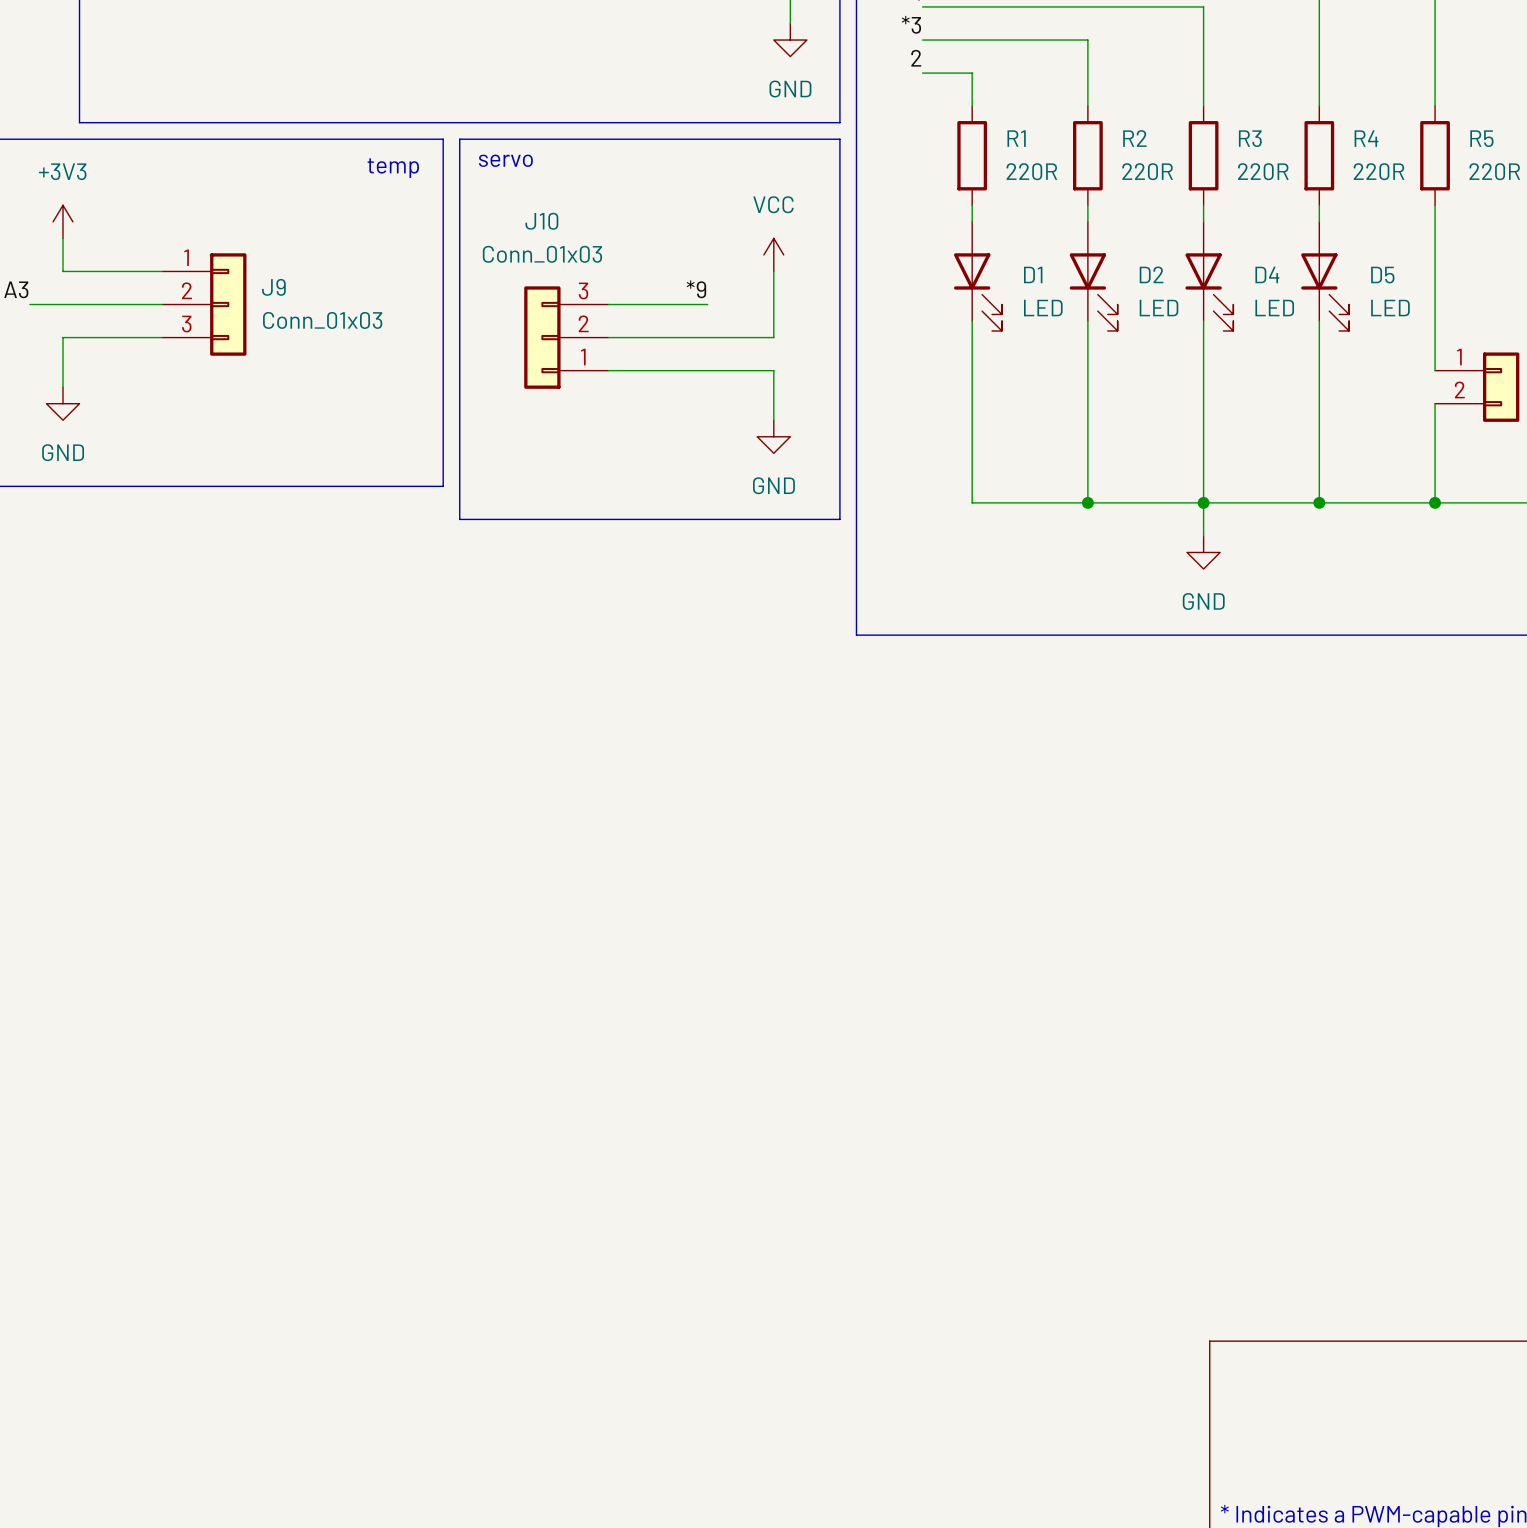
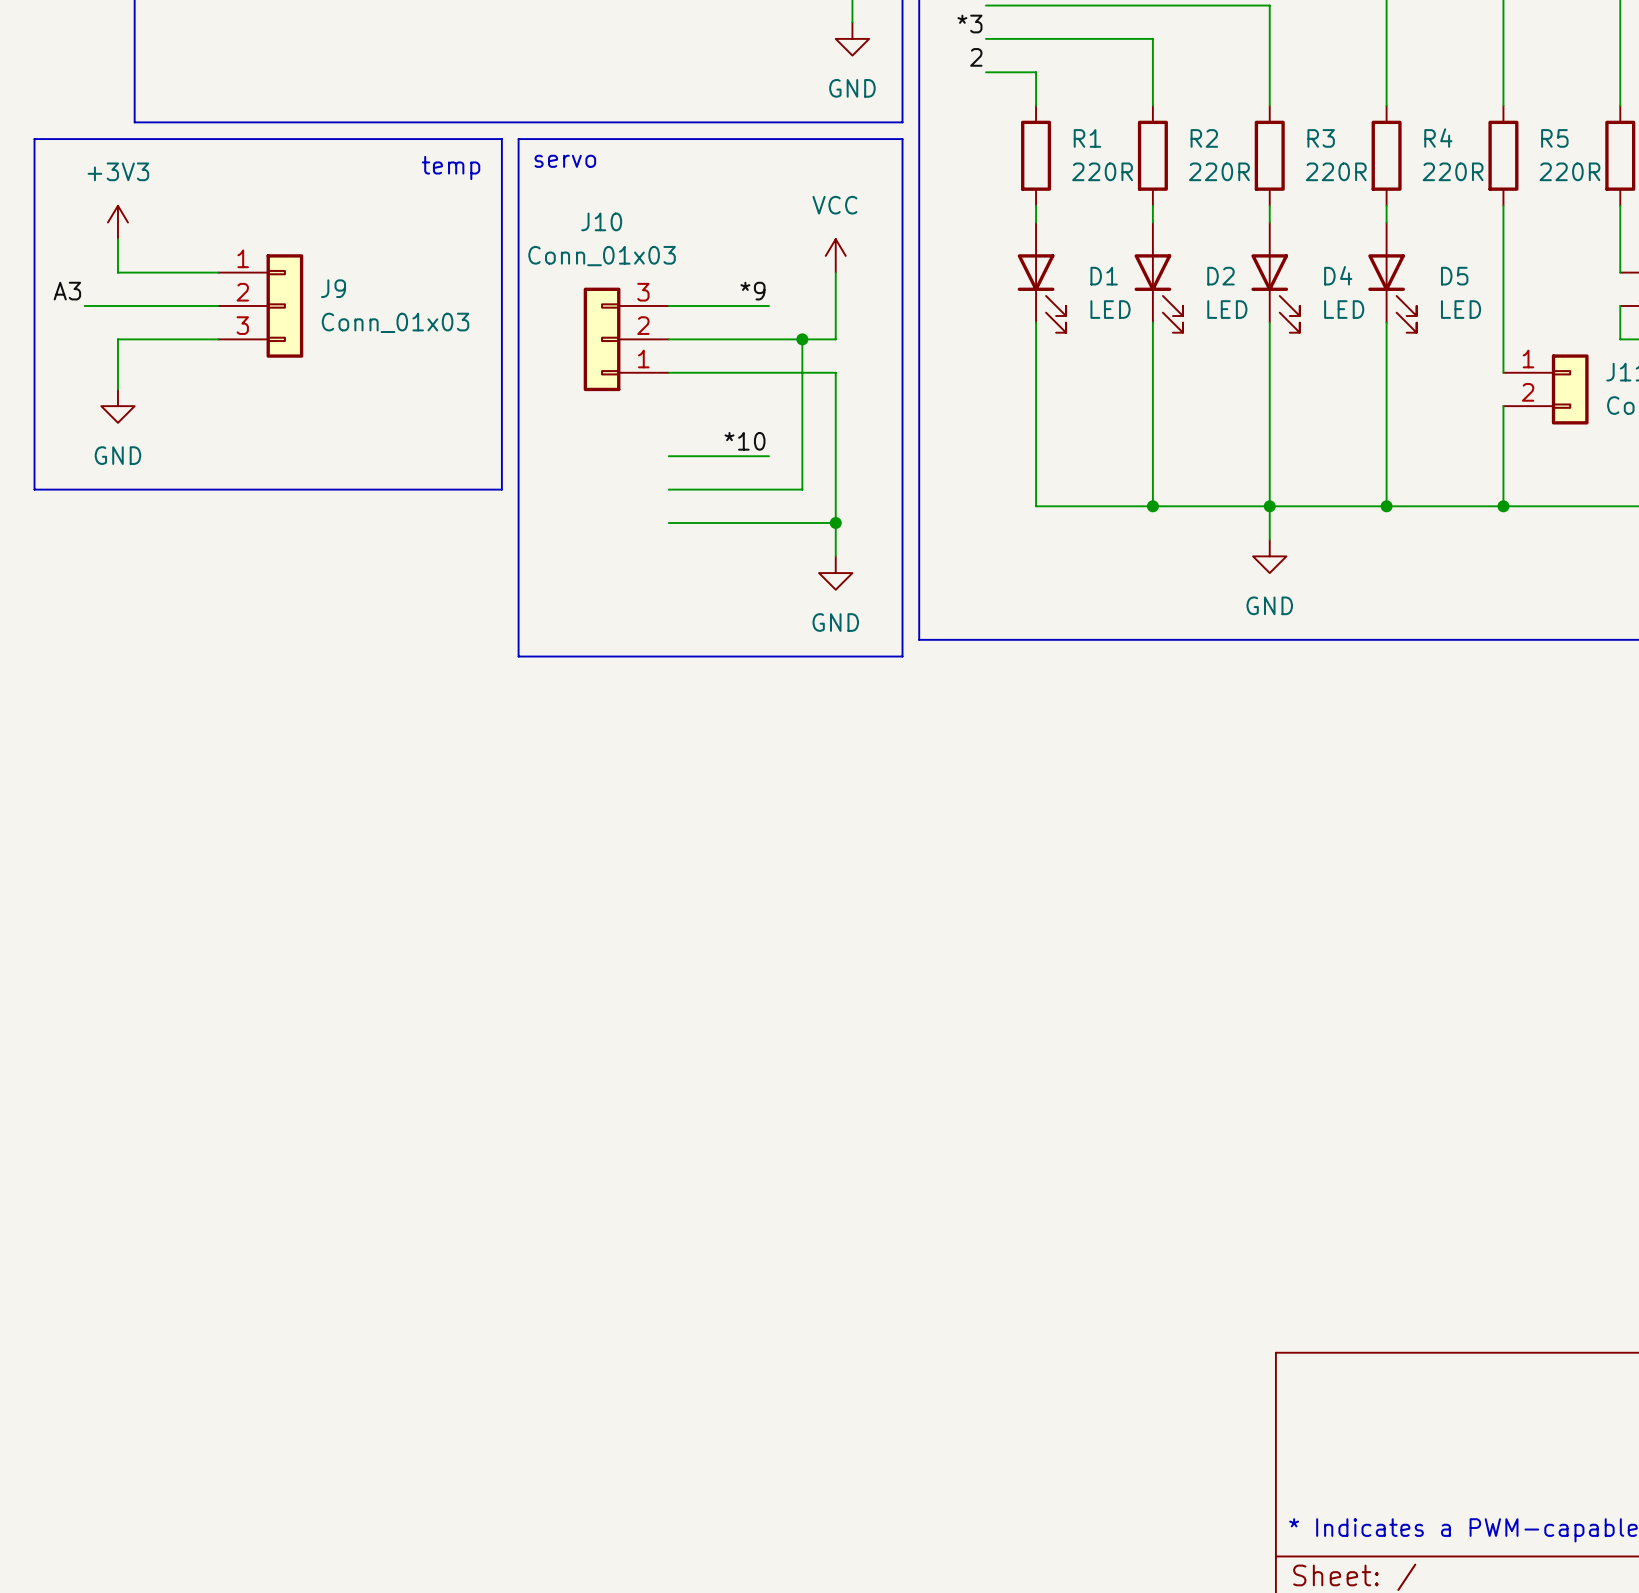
wire: none -> (802, 339) (802, 489) (668, 489)
junction: none -> (802, 339)
wire: none -> (835, 422) (835, 556)
power symbol position: GND (773, 436) -> GND (835, 573)
label: none -> *10 (745, 441)
wire: none -> (668, 456) (768, 456)
line: (459, 519) (839, 519) -> (518, 522) (518, 656) (902, 656) (902, 522)
junction: none -> (835, 522)

